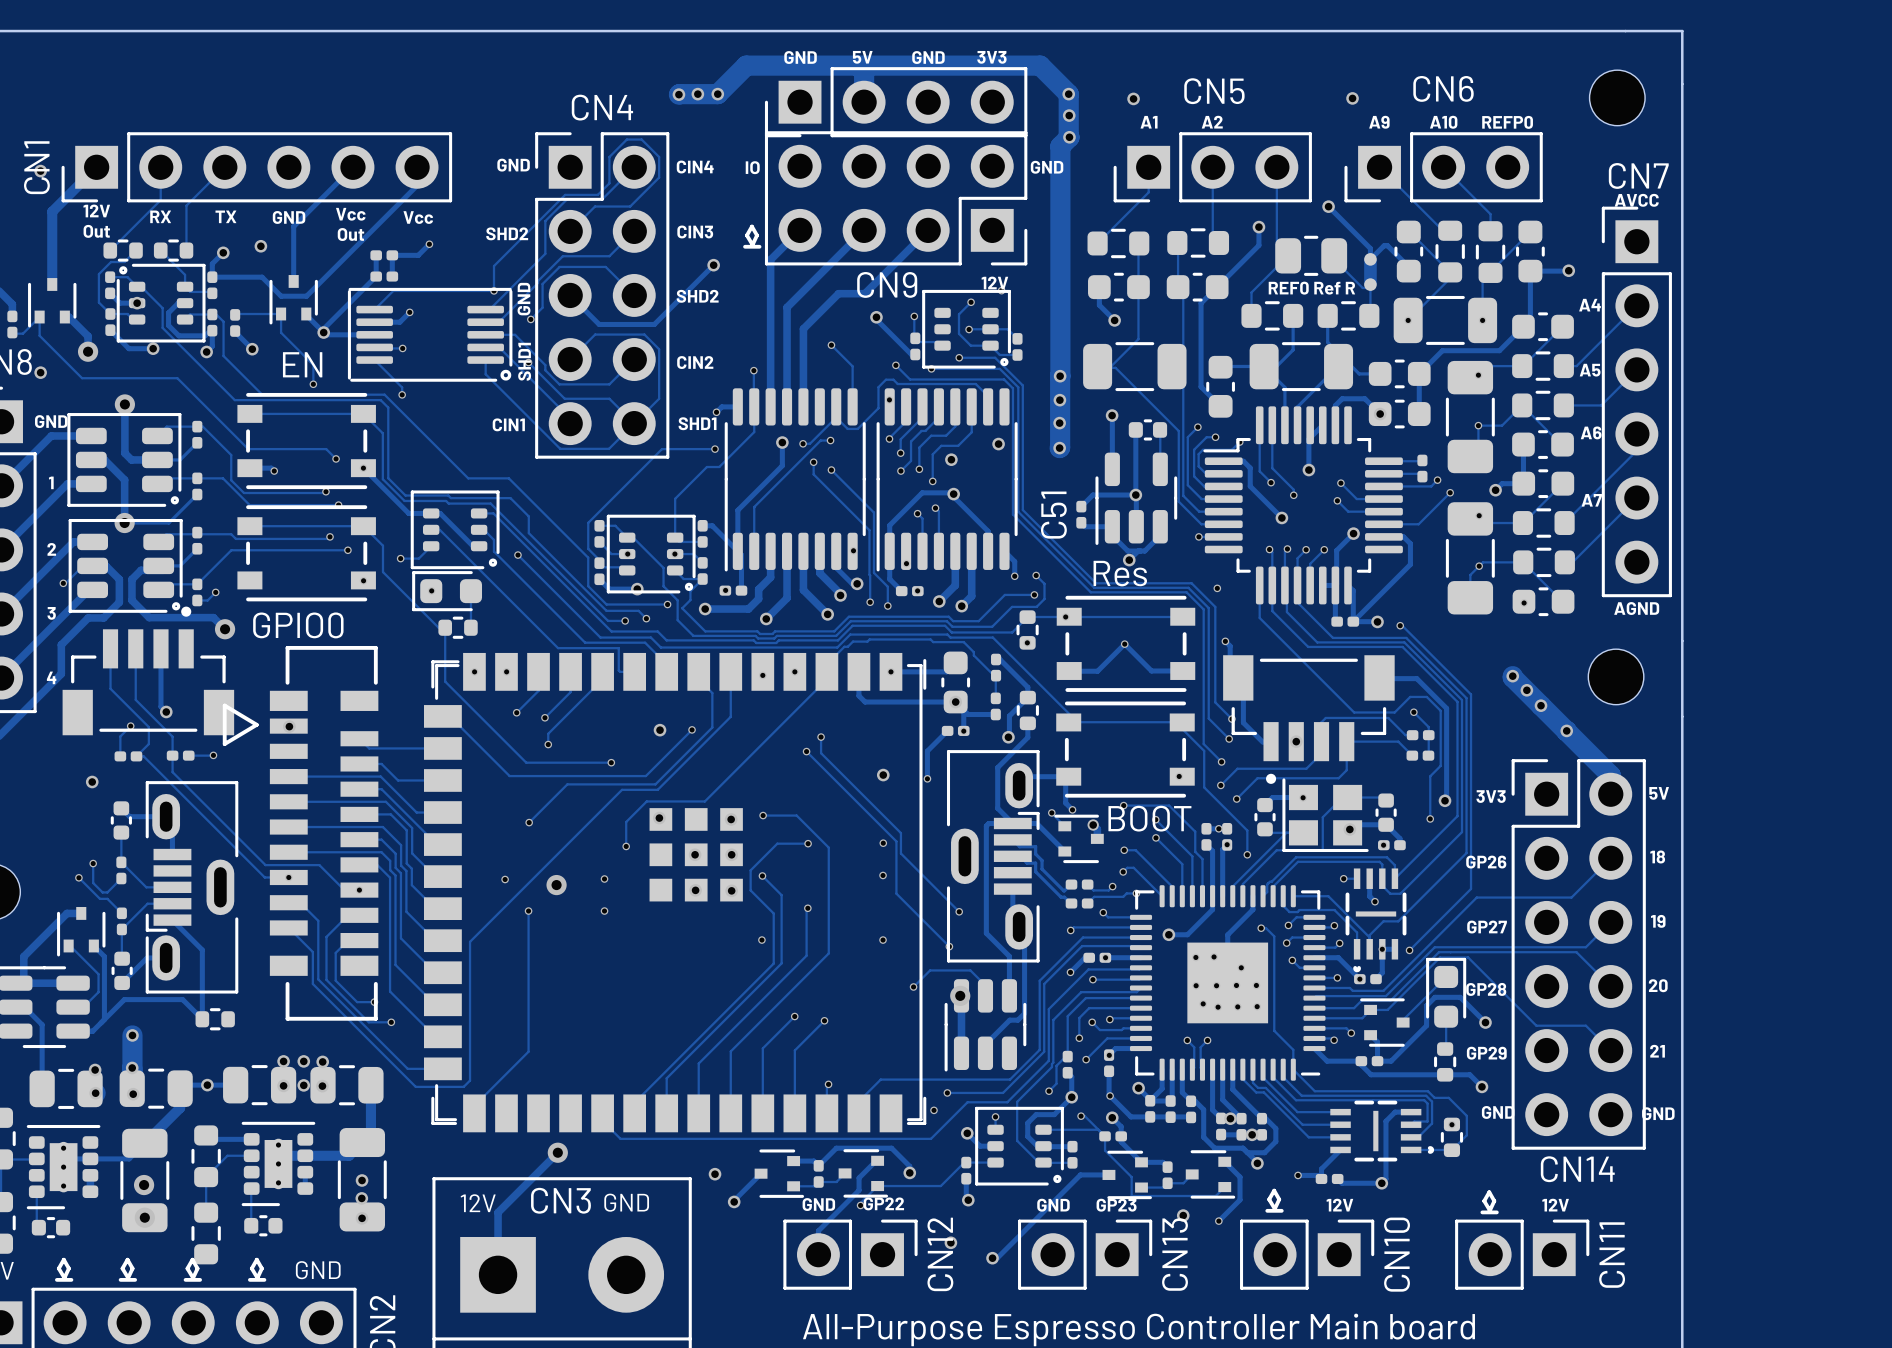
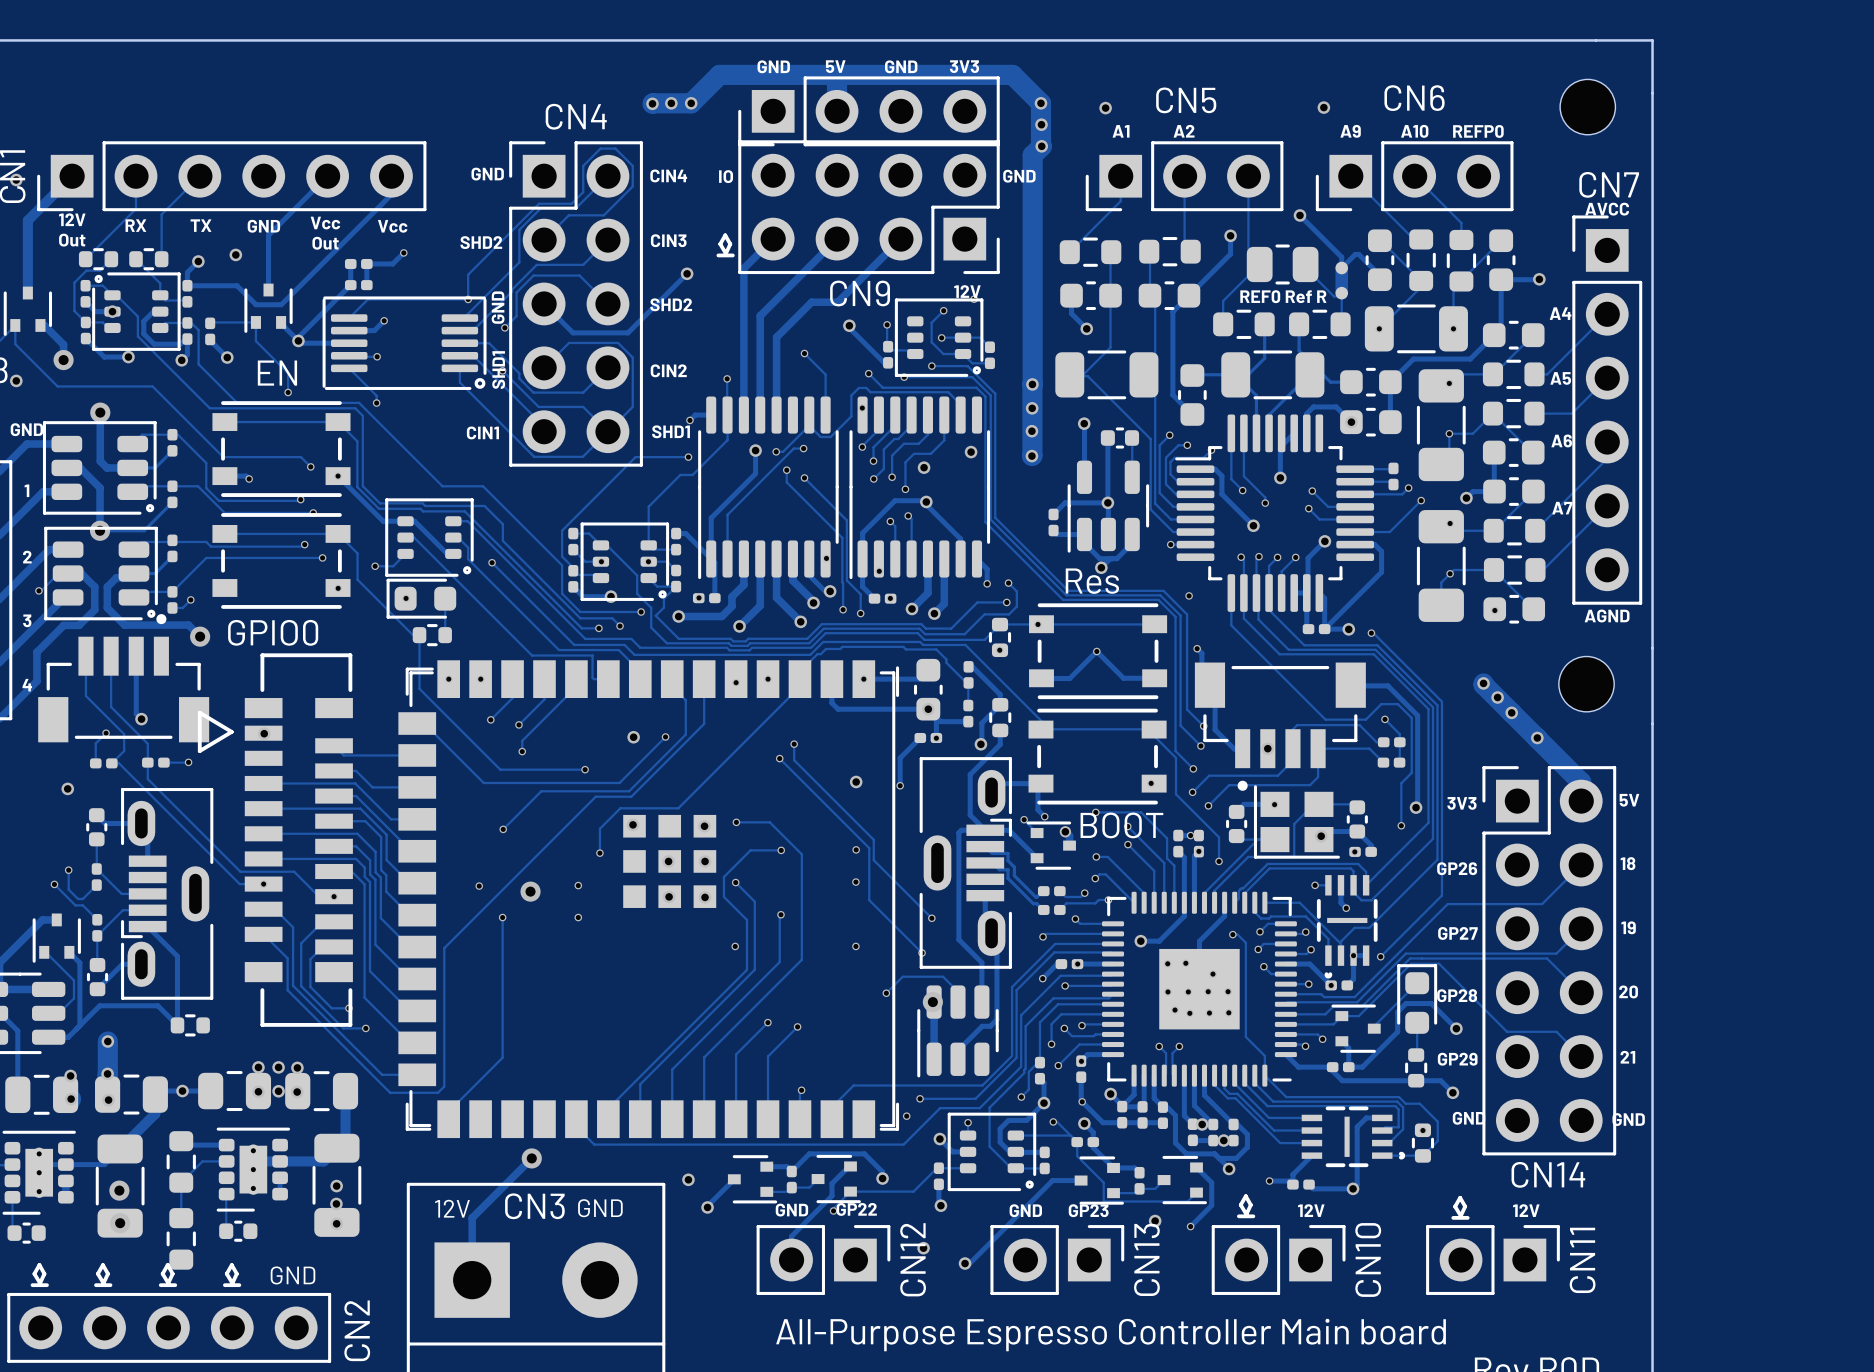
C51 name: C51 (1053, 515) -> none

